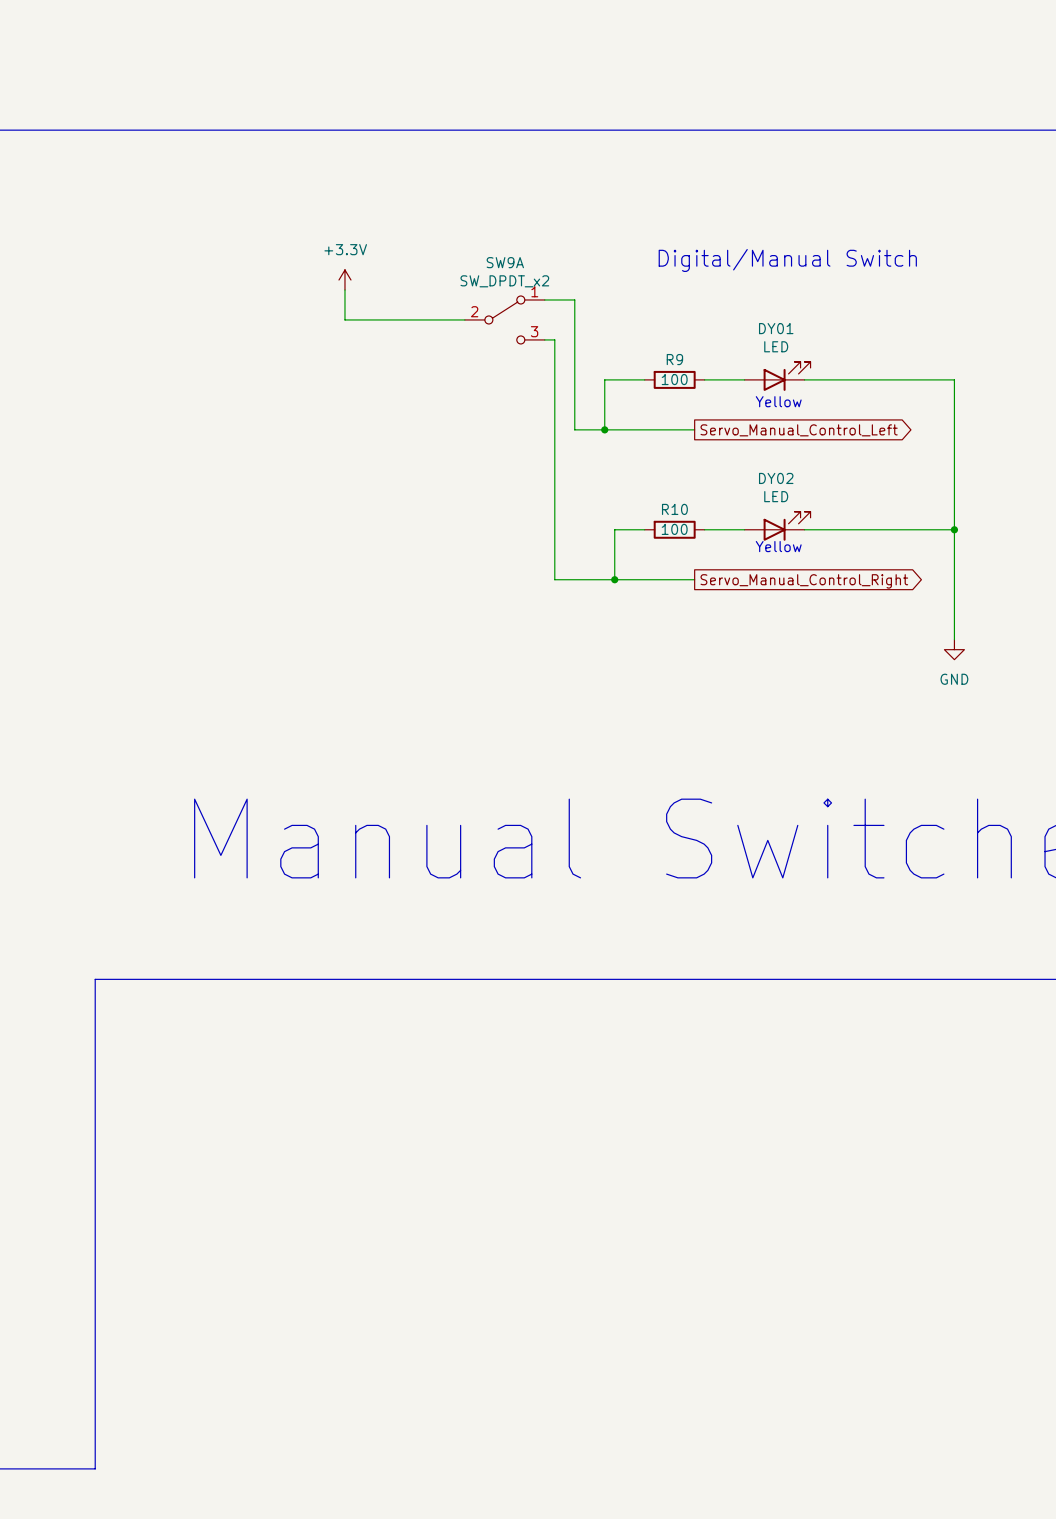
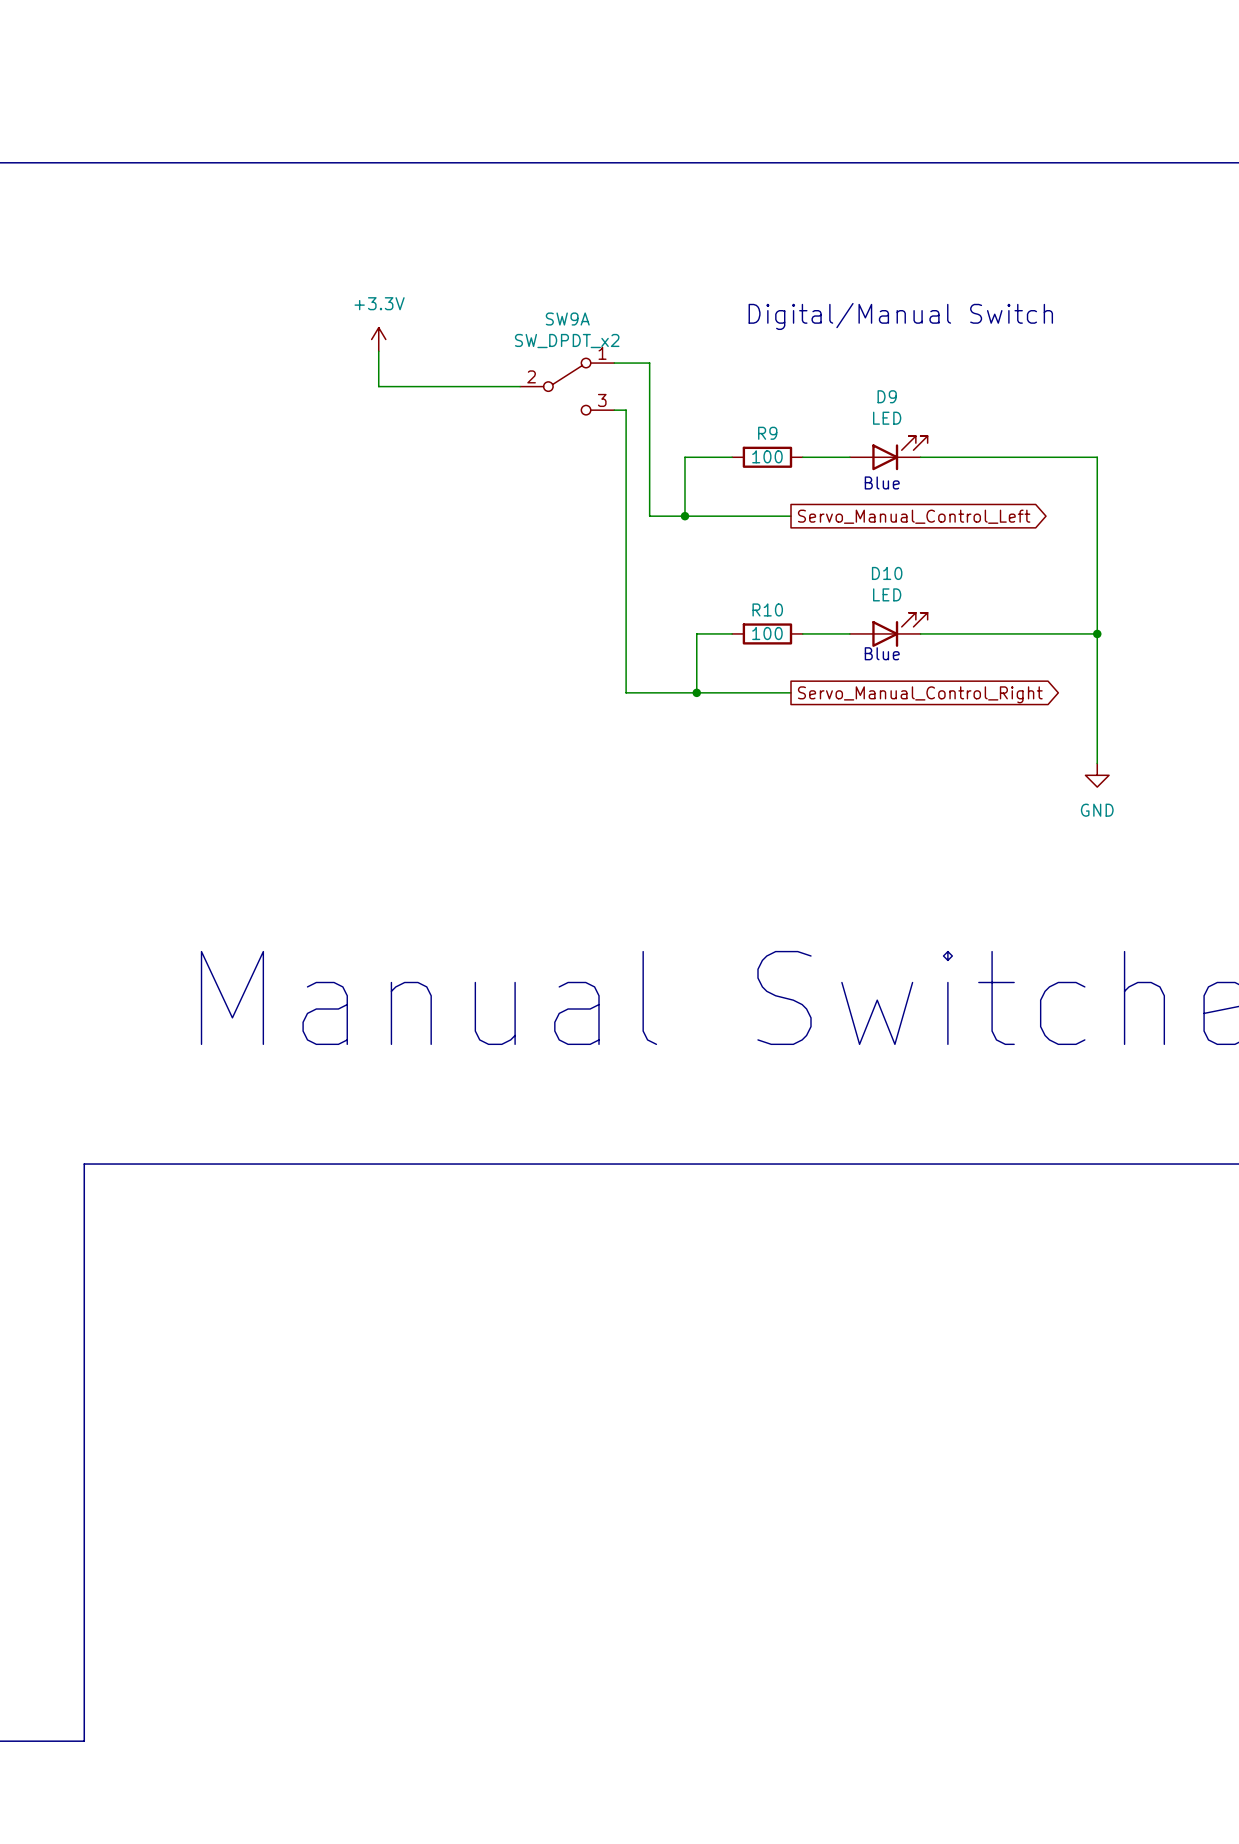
DY01 name: DY01 (776, 328) -> D9 (887, 396)
text: Yellow (778, 401) -> Blue (882, 482)
DY02 name: DY02 (776, 478) -> D10 (887, 573)
text: Yellow (778, 546) -> Blue (882, 653)

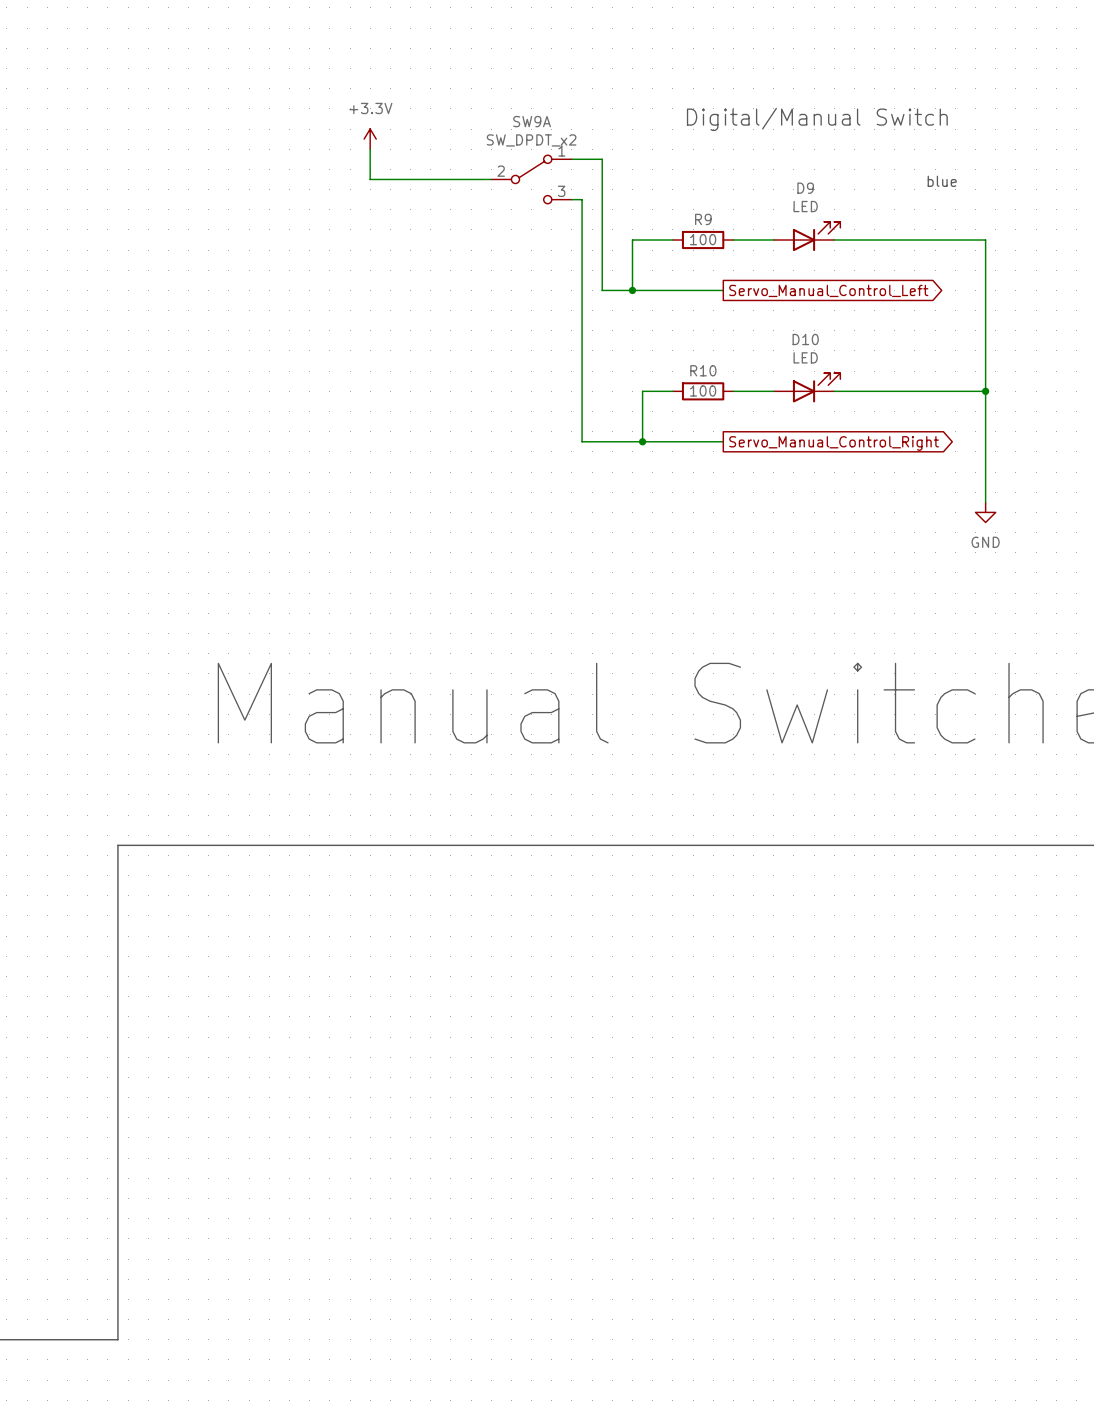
text: none -> blue (942, 181)
text: Blue (882, 482) -> none
text: Blue (882, 653) -> none

